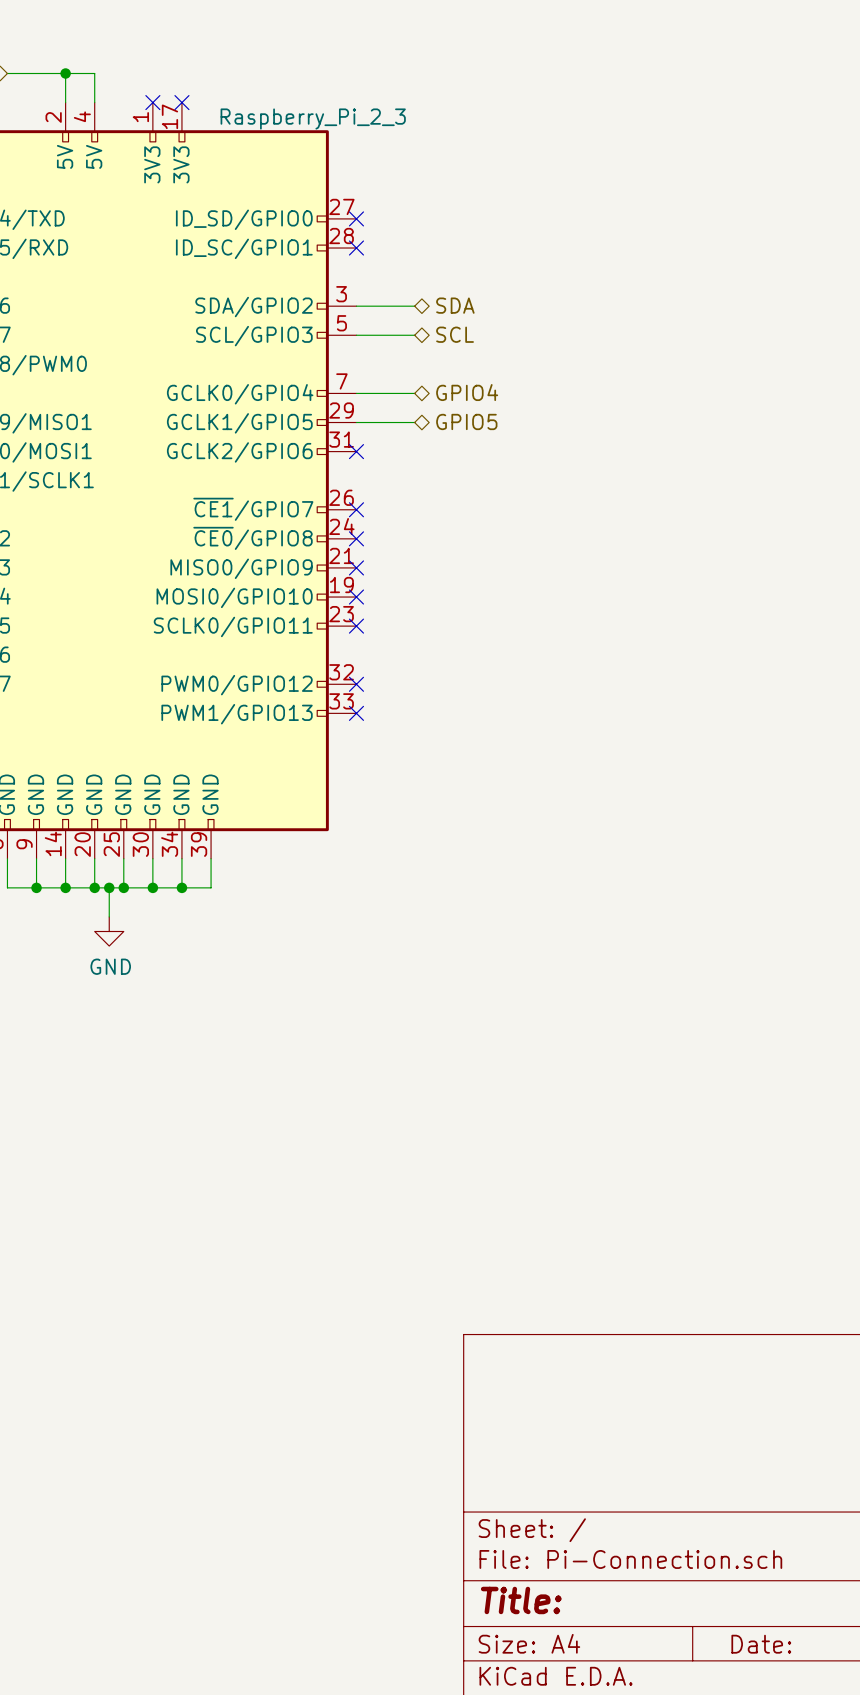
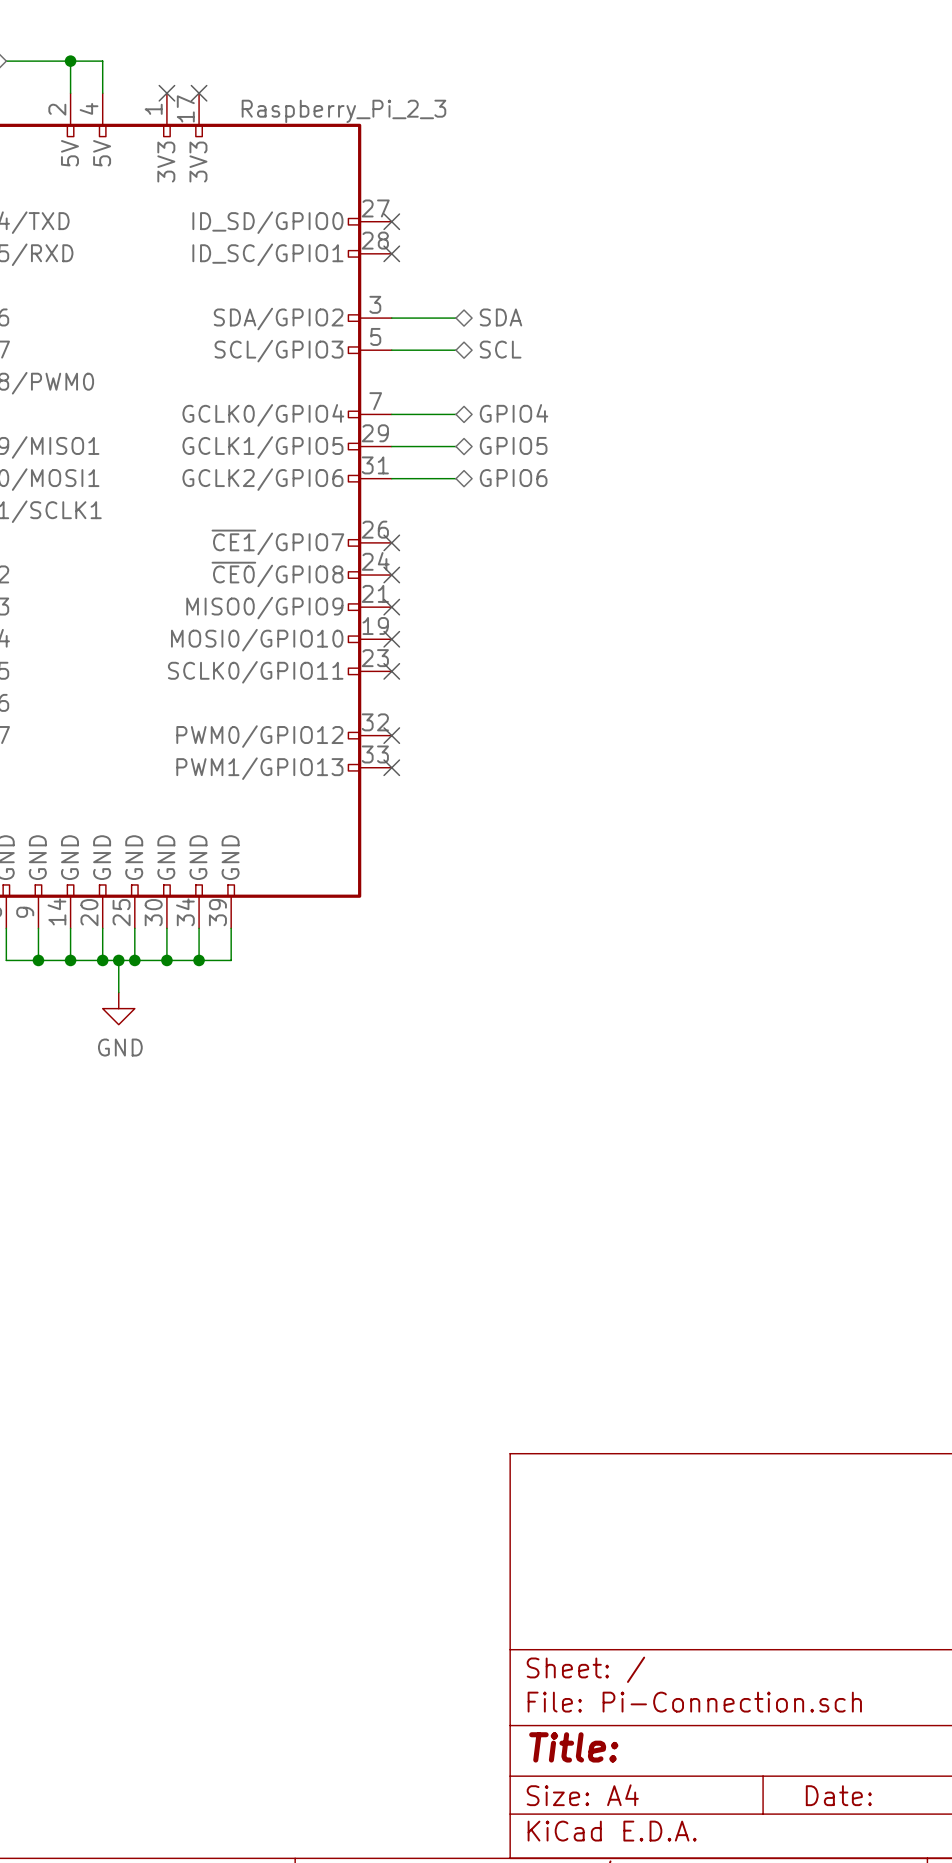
wire: none -> (391, 478) (456, 478)
no-connect mark: (356, 451) -> none
hierarchical label: none -> GPIO6 (513, 478)

